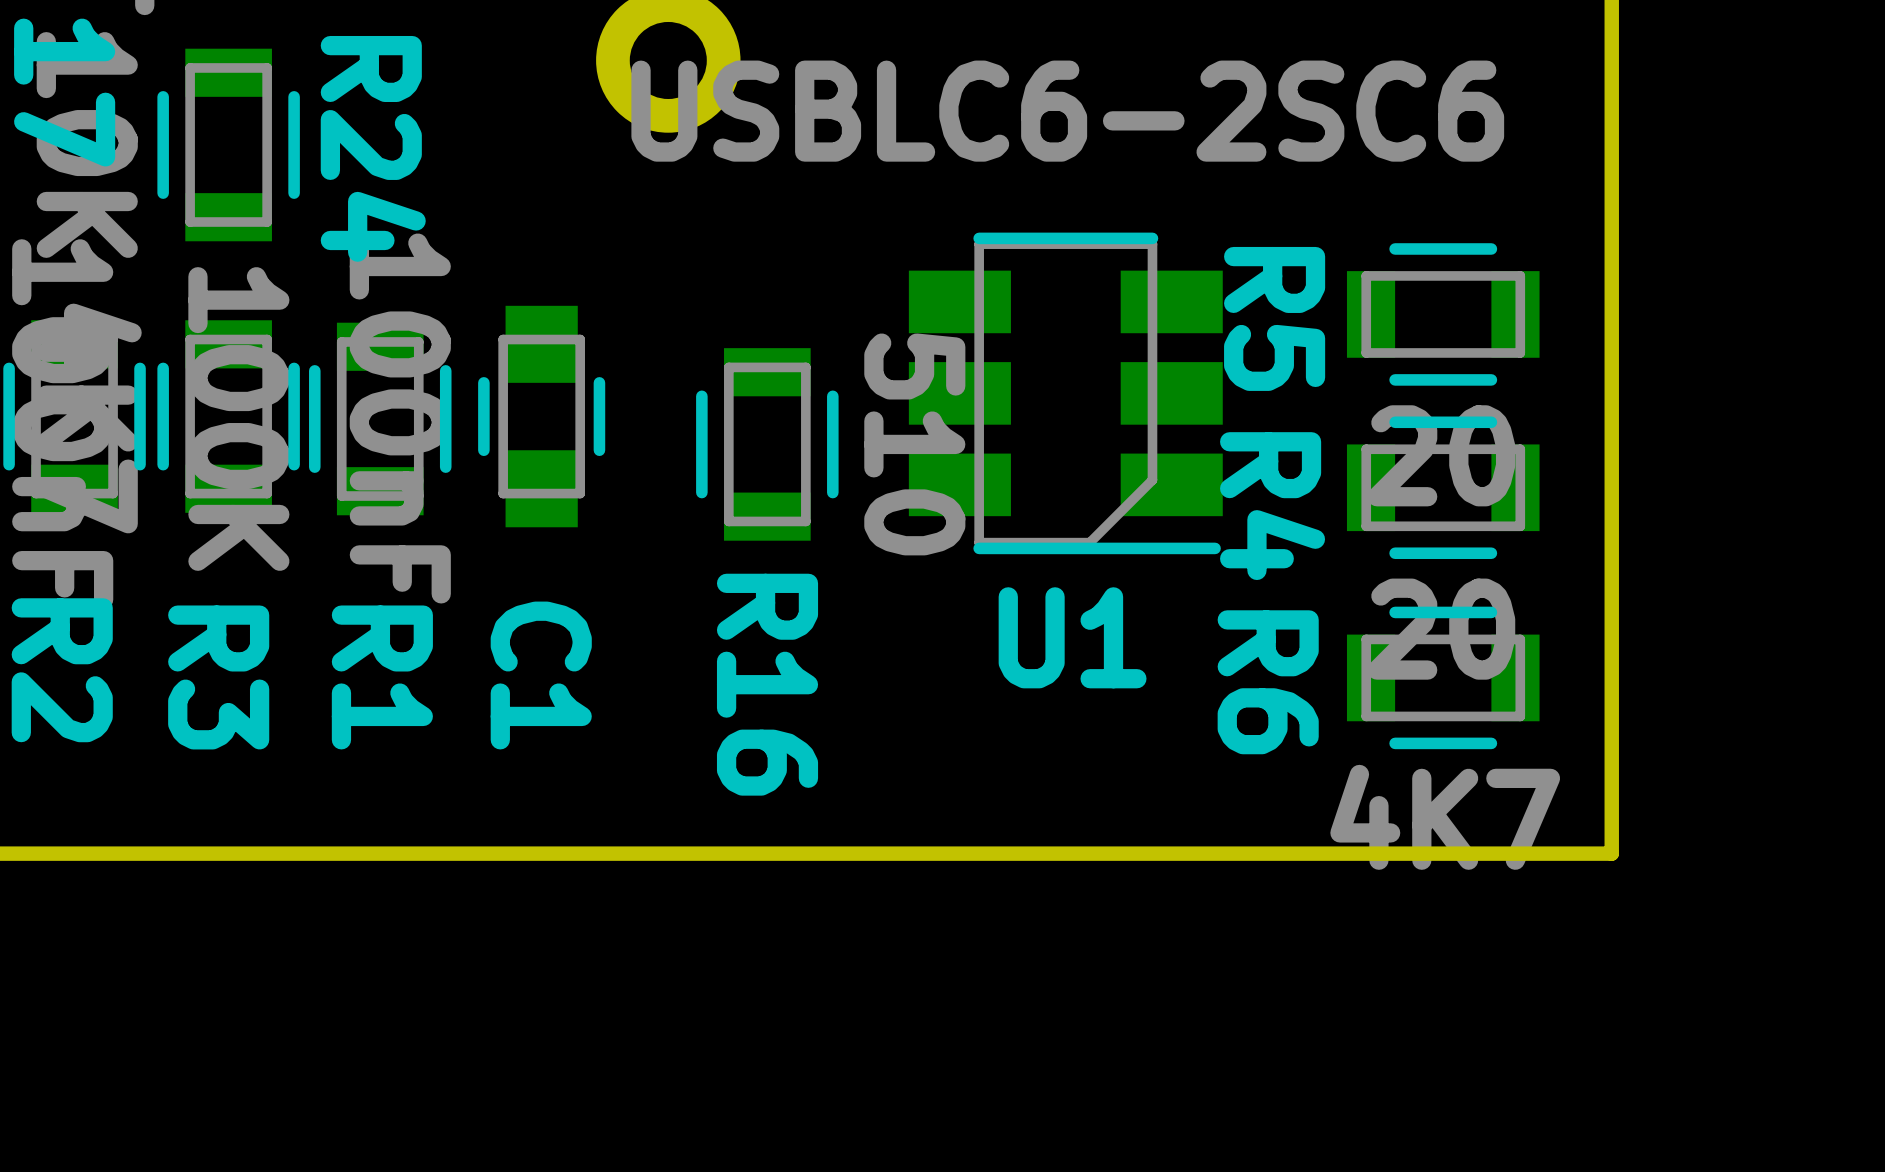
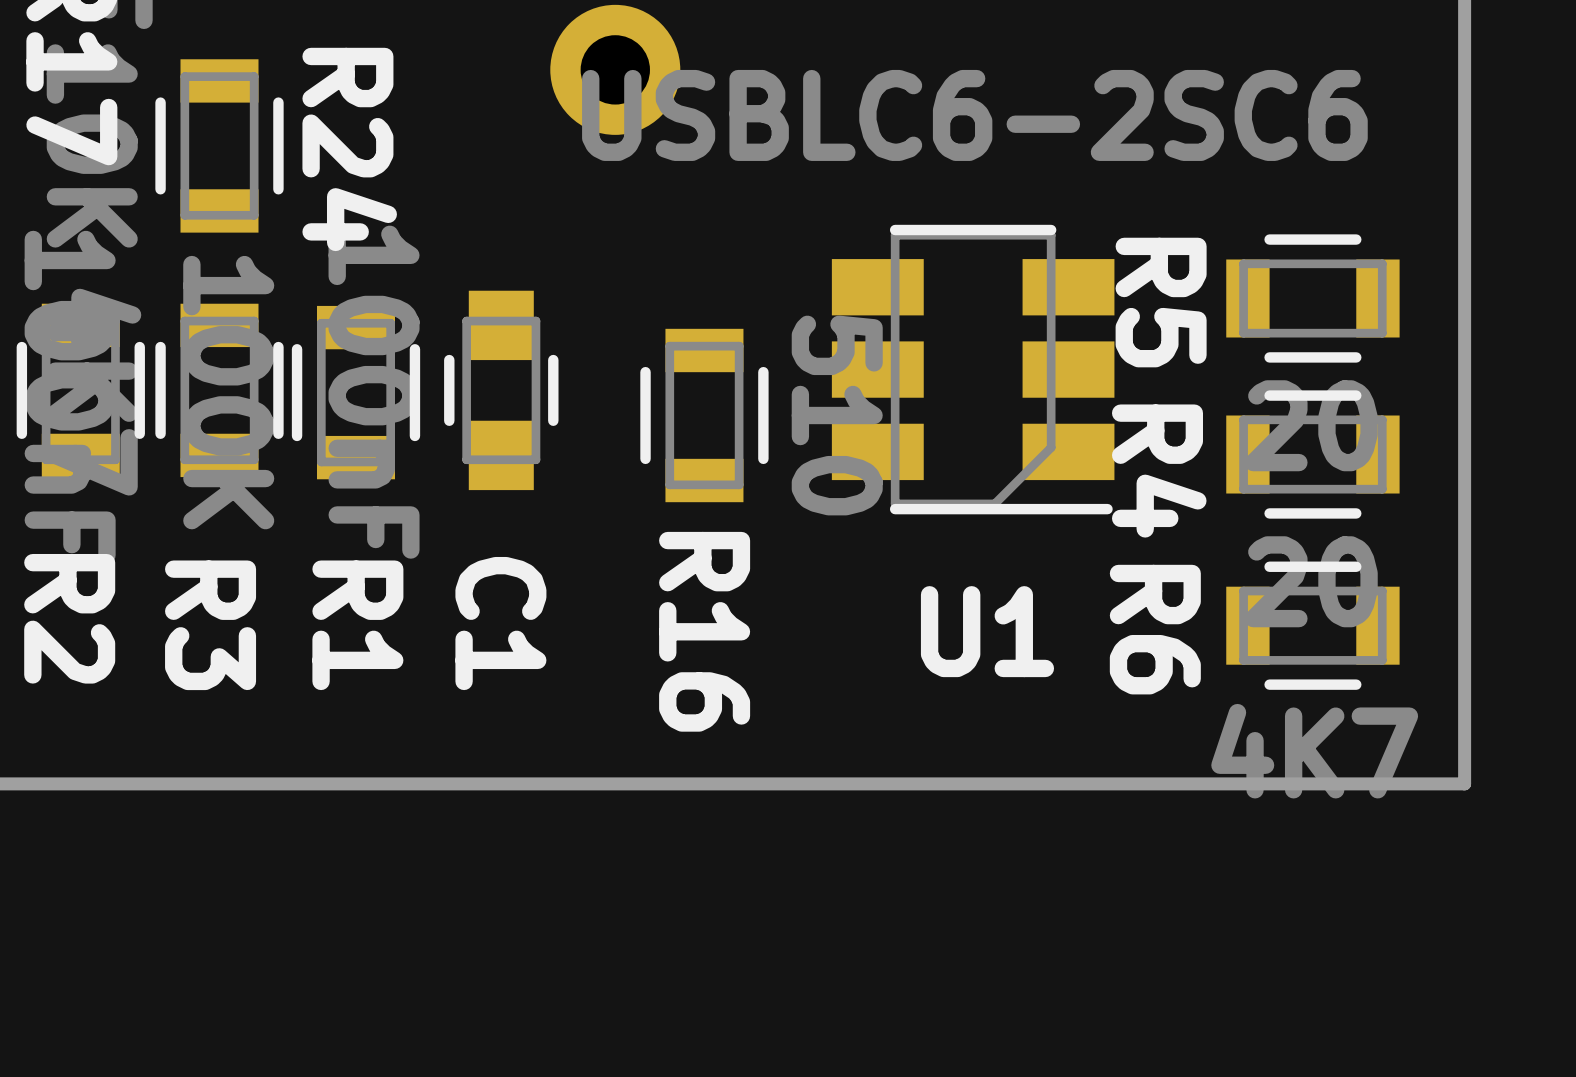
U1 name position: U1 (1072, 637) -> U1 (987, 631)

